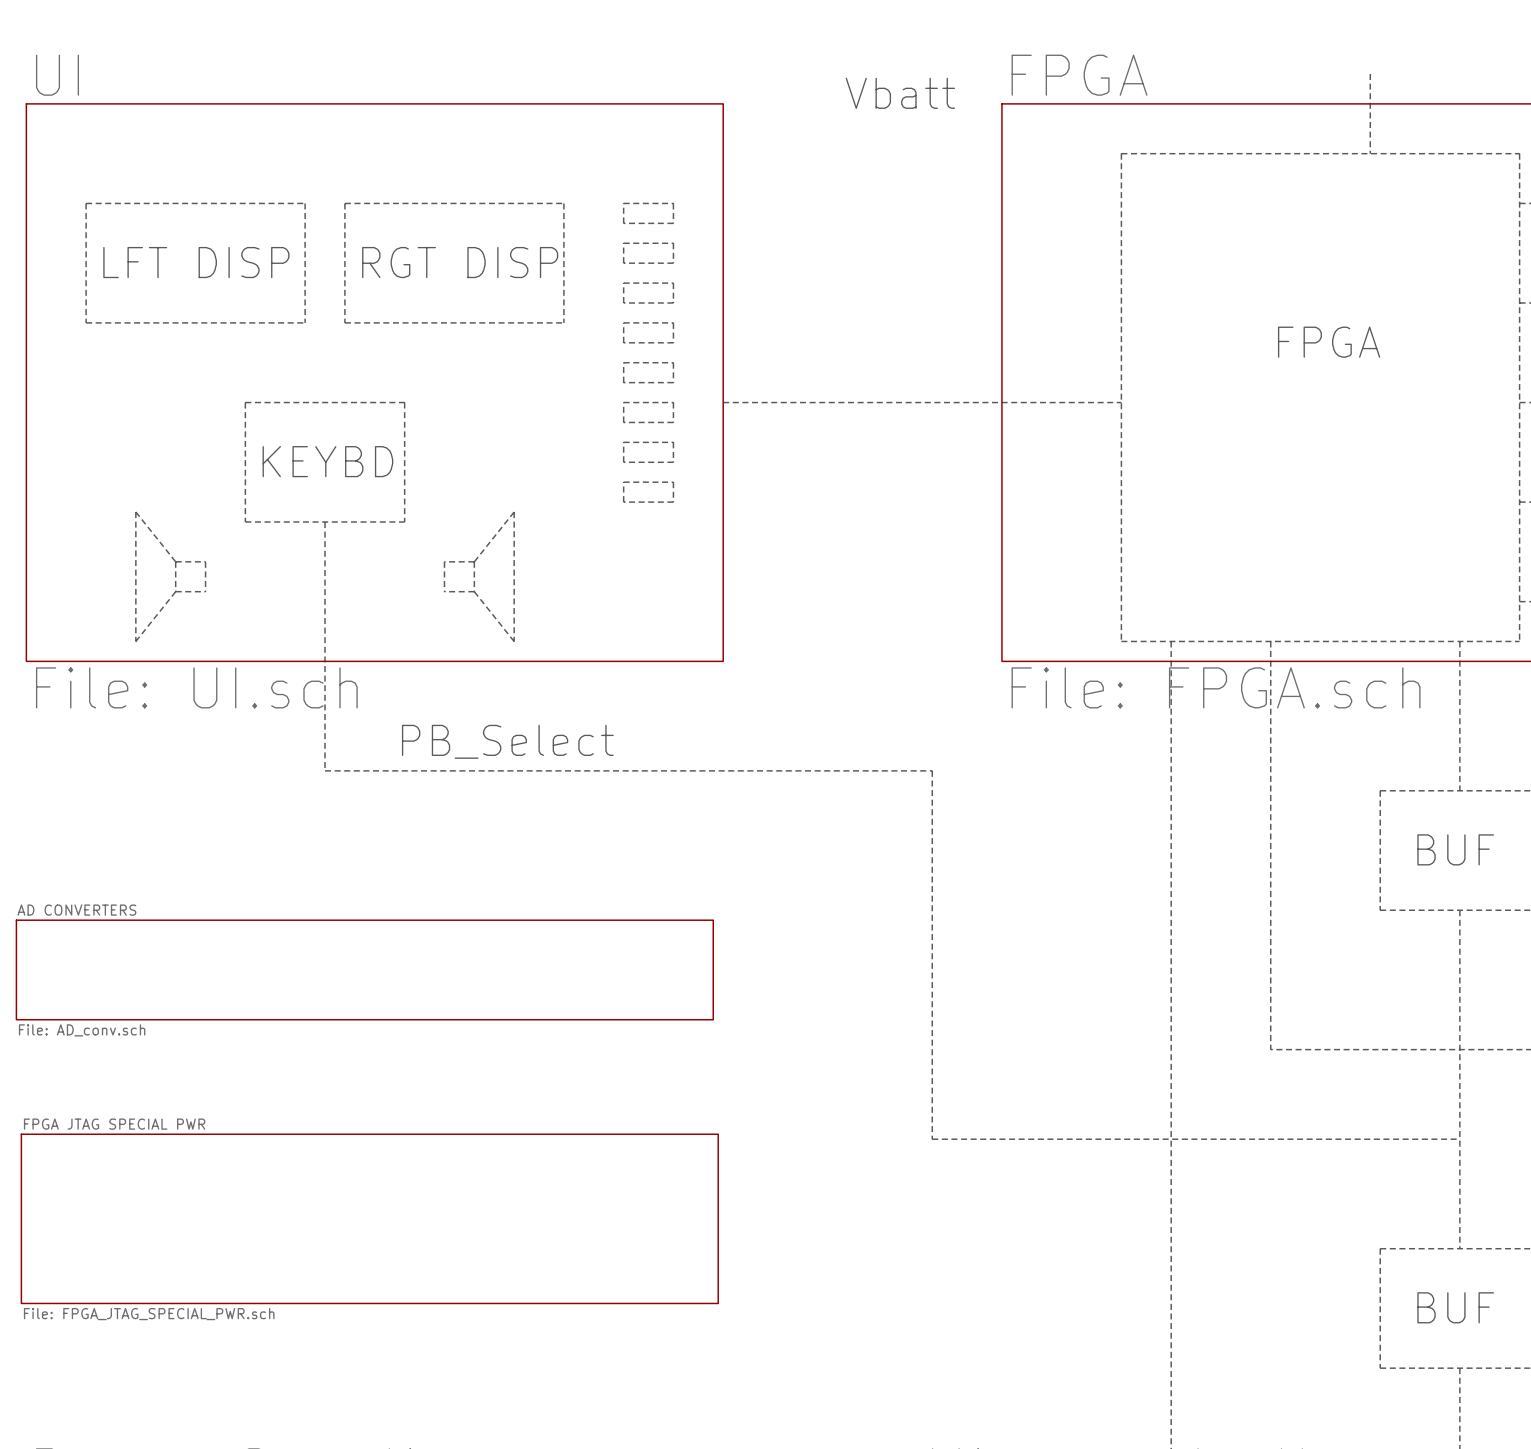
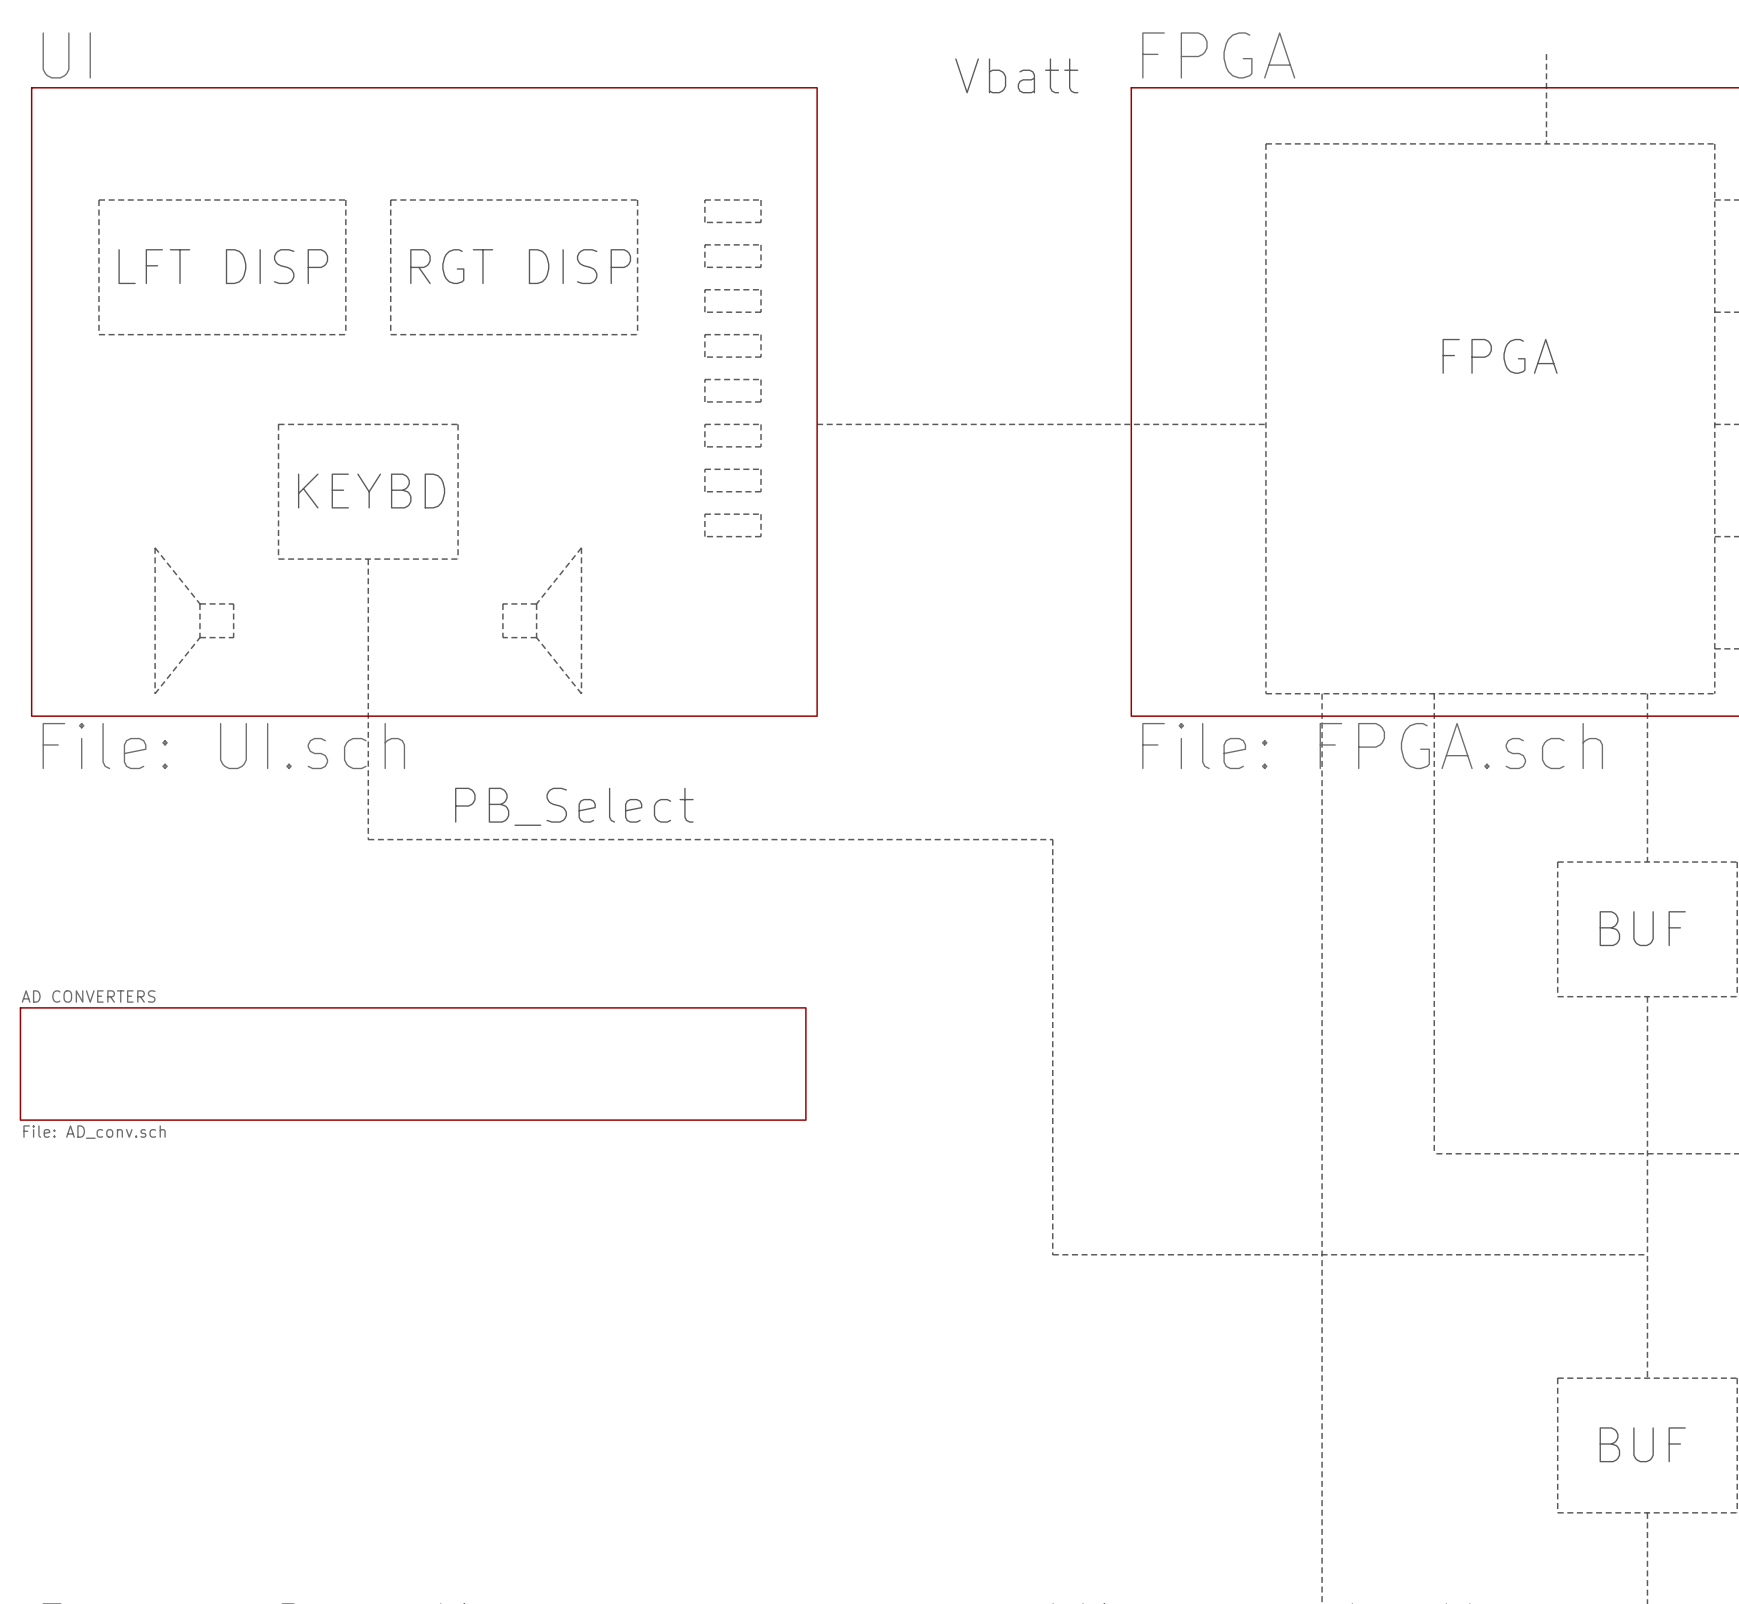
sheet FPGA JTAG SPECIAL PWR: File: FPGA_JTAG_SPECIAL_PWR.sch (369, 1218) -> none

